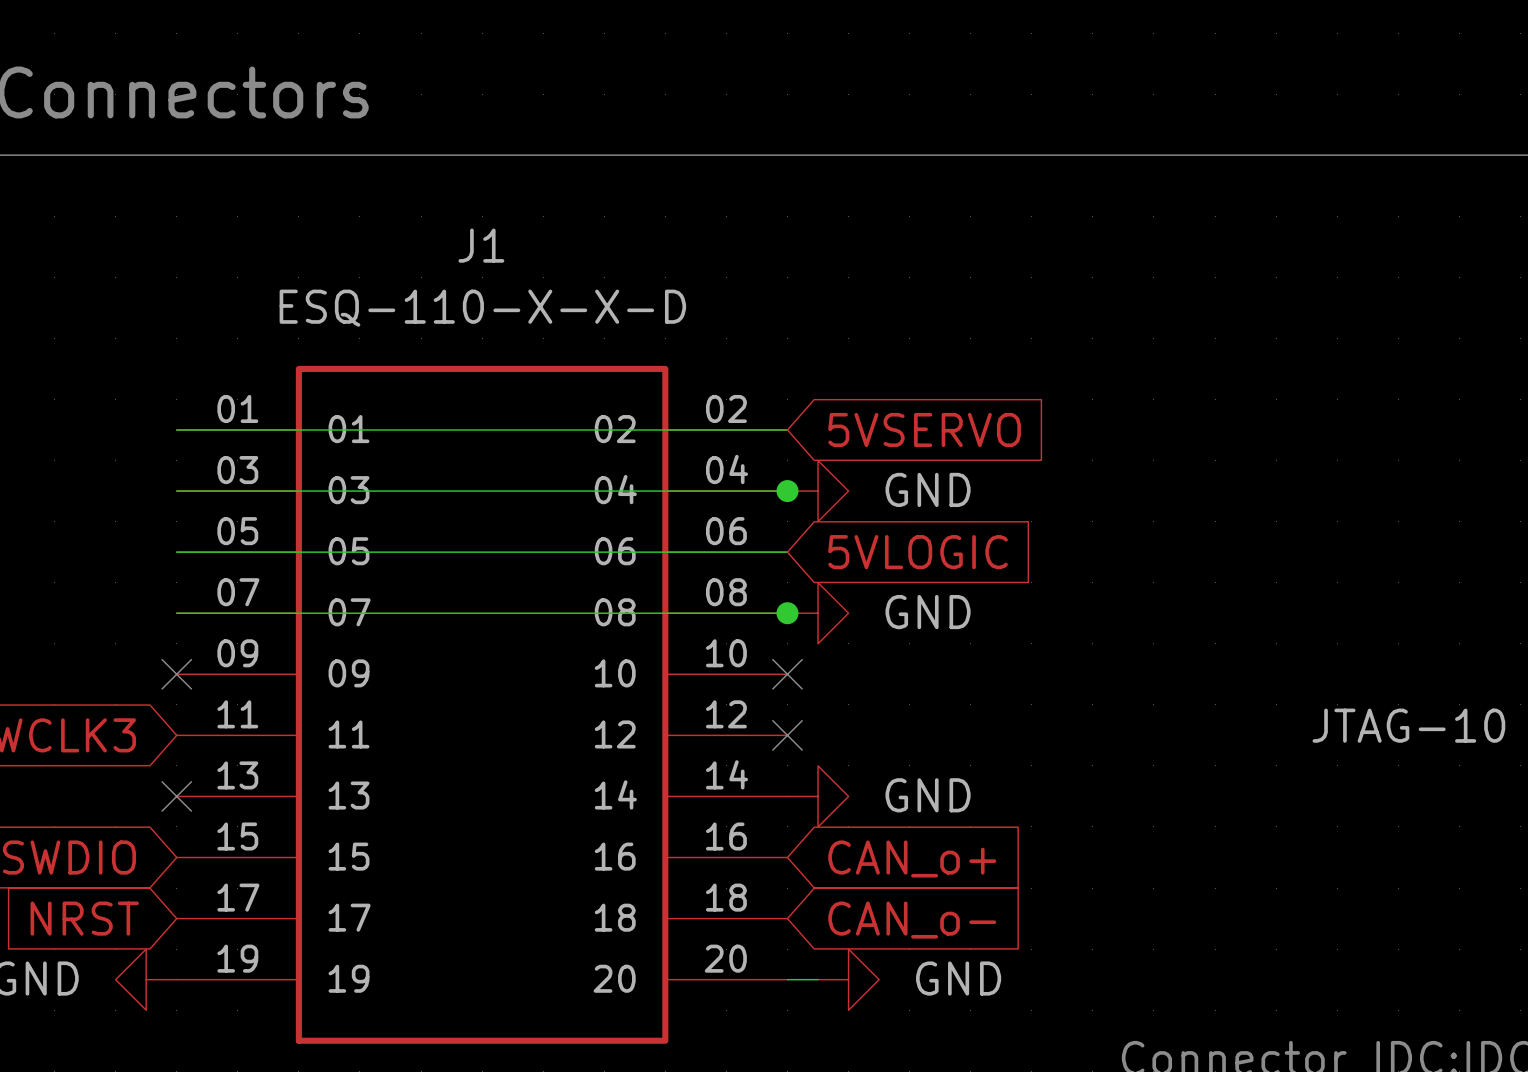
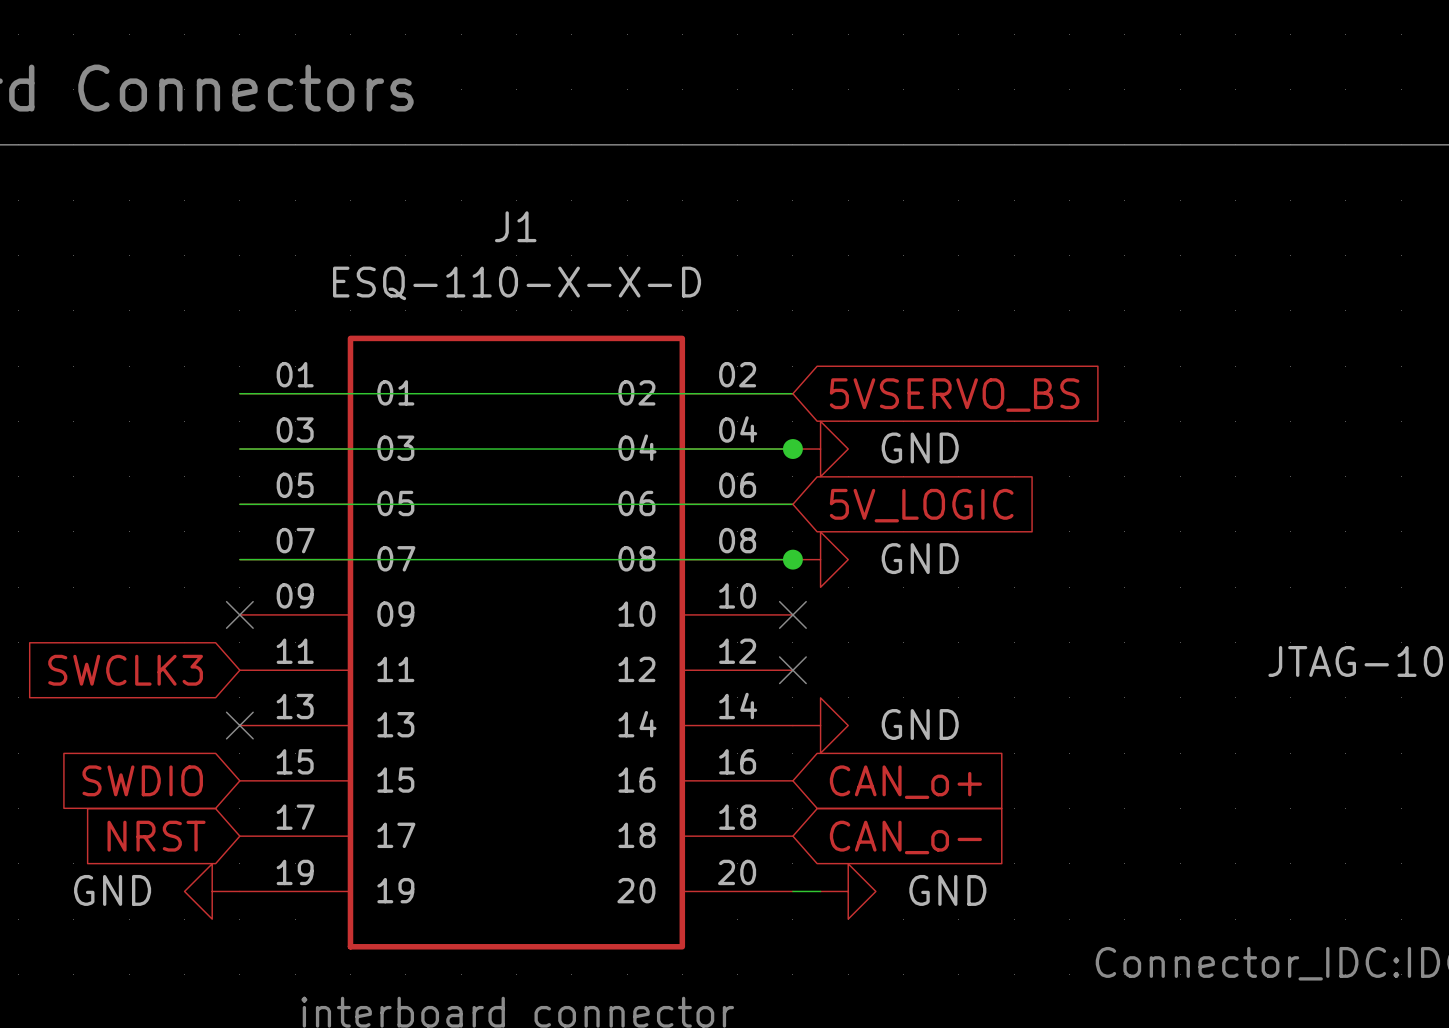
global label: 5VSERVO (924, 429) -> 5VSERVO_BS (954, 395)
global label: 5VLOGIC (918, 552) -> 5V_LOGIC (921, 505)

